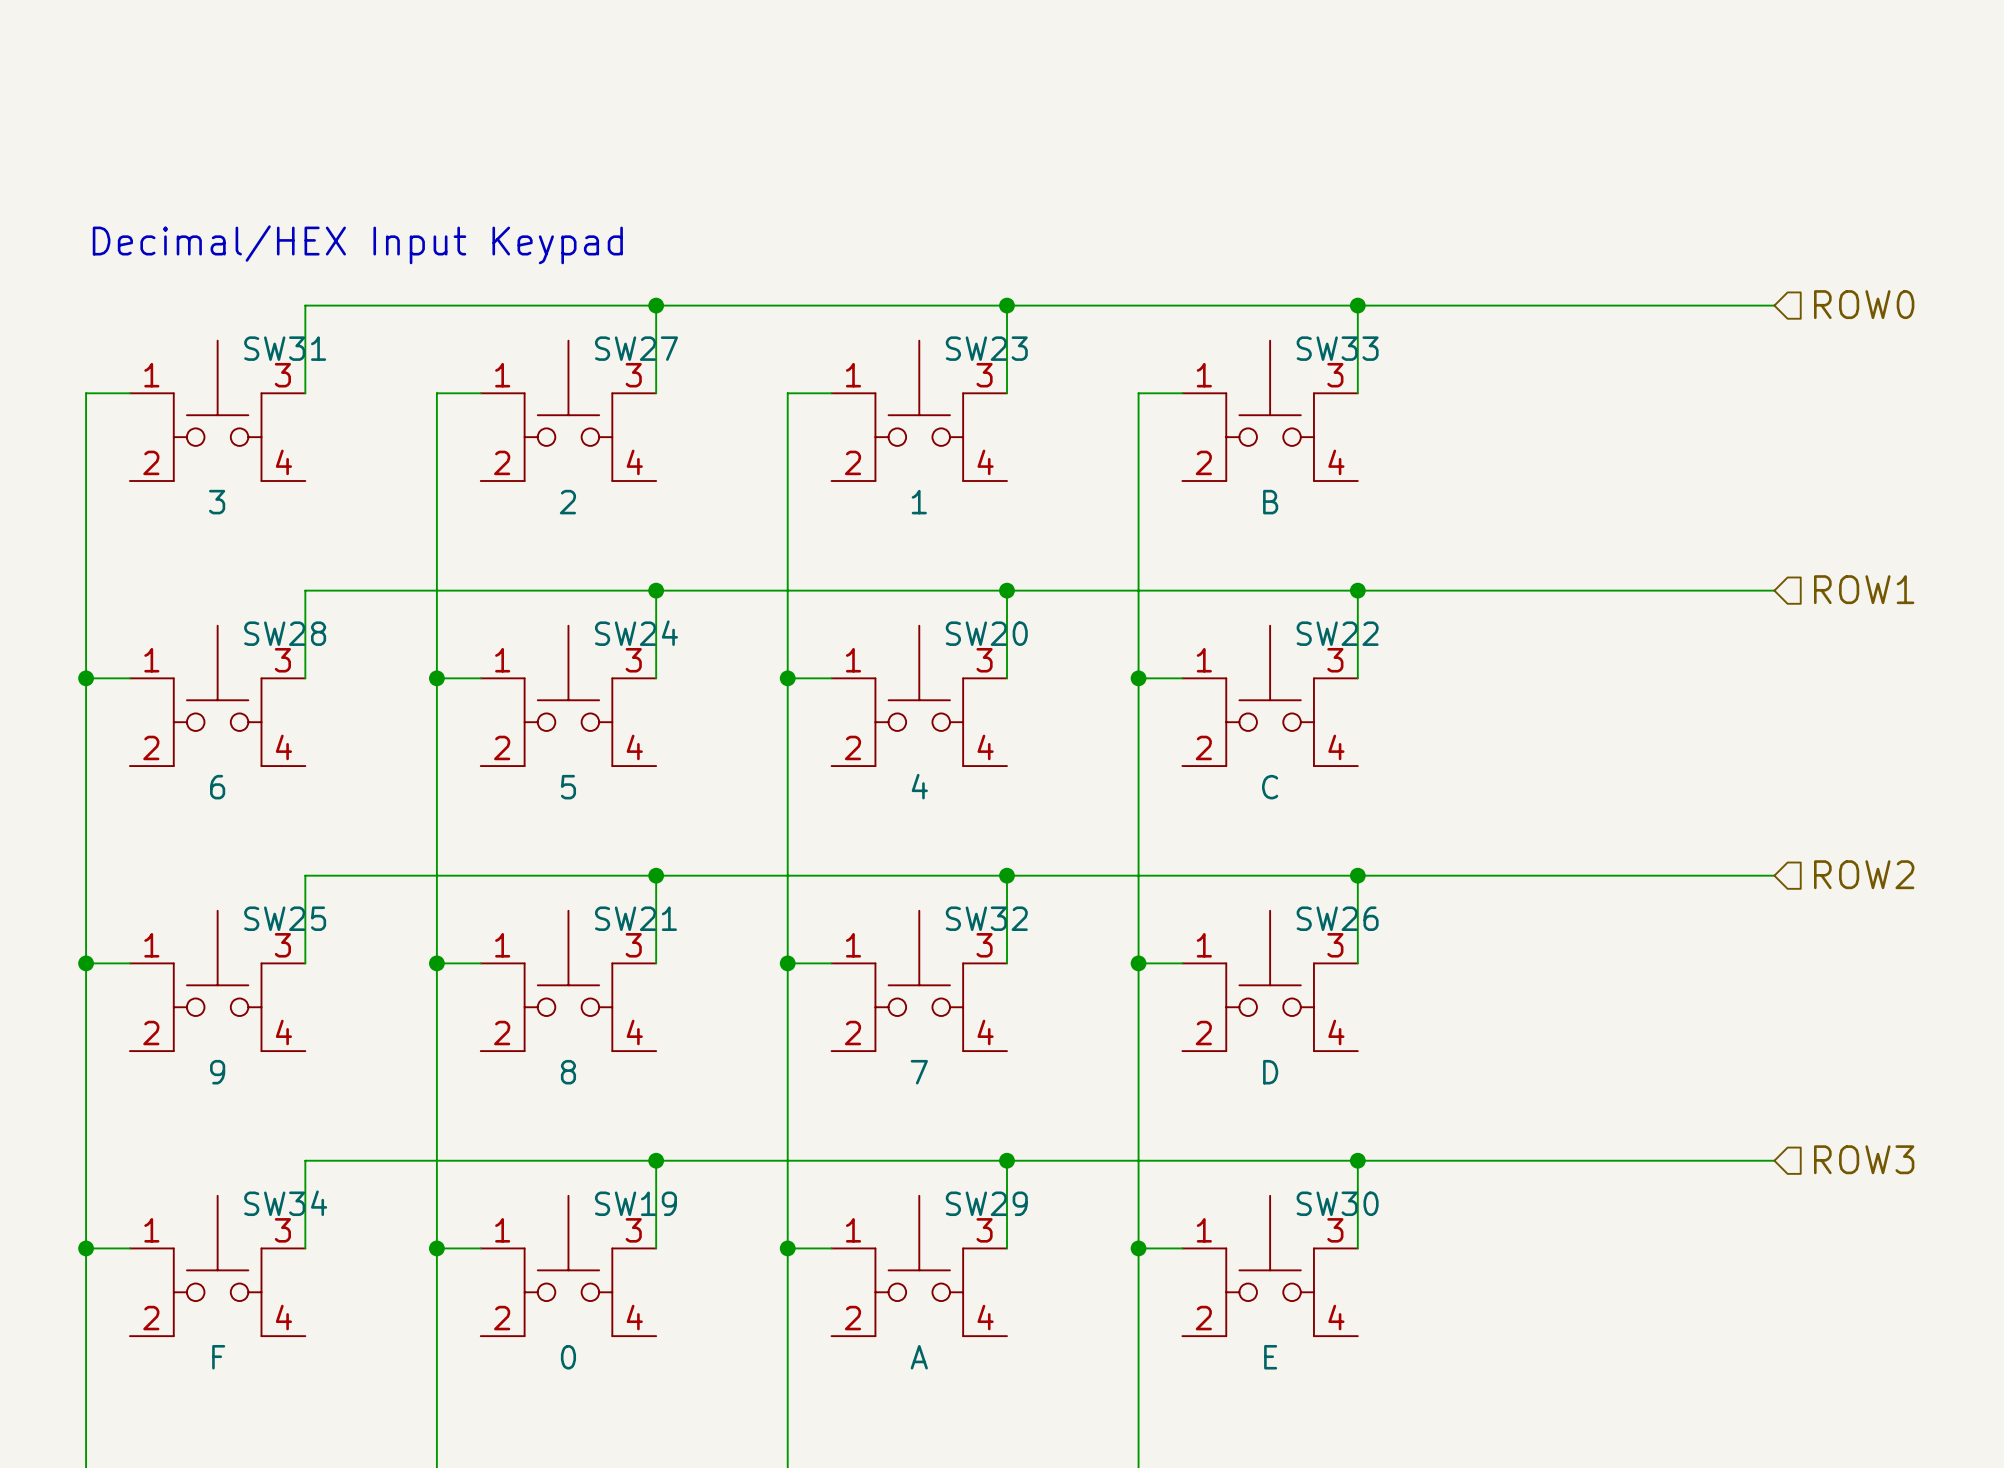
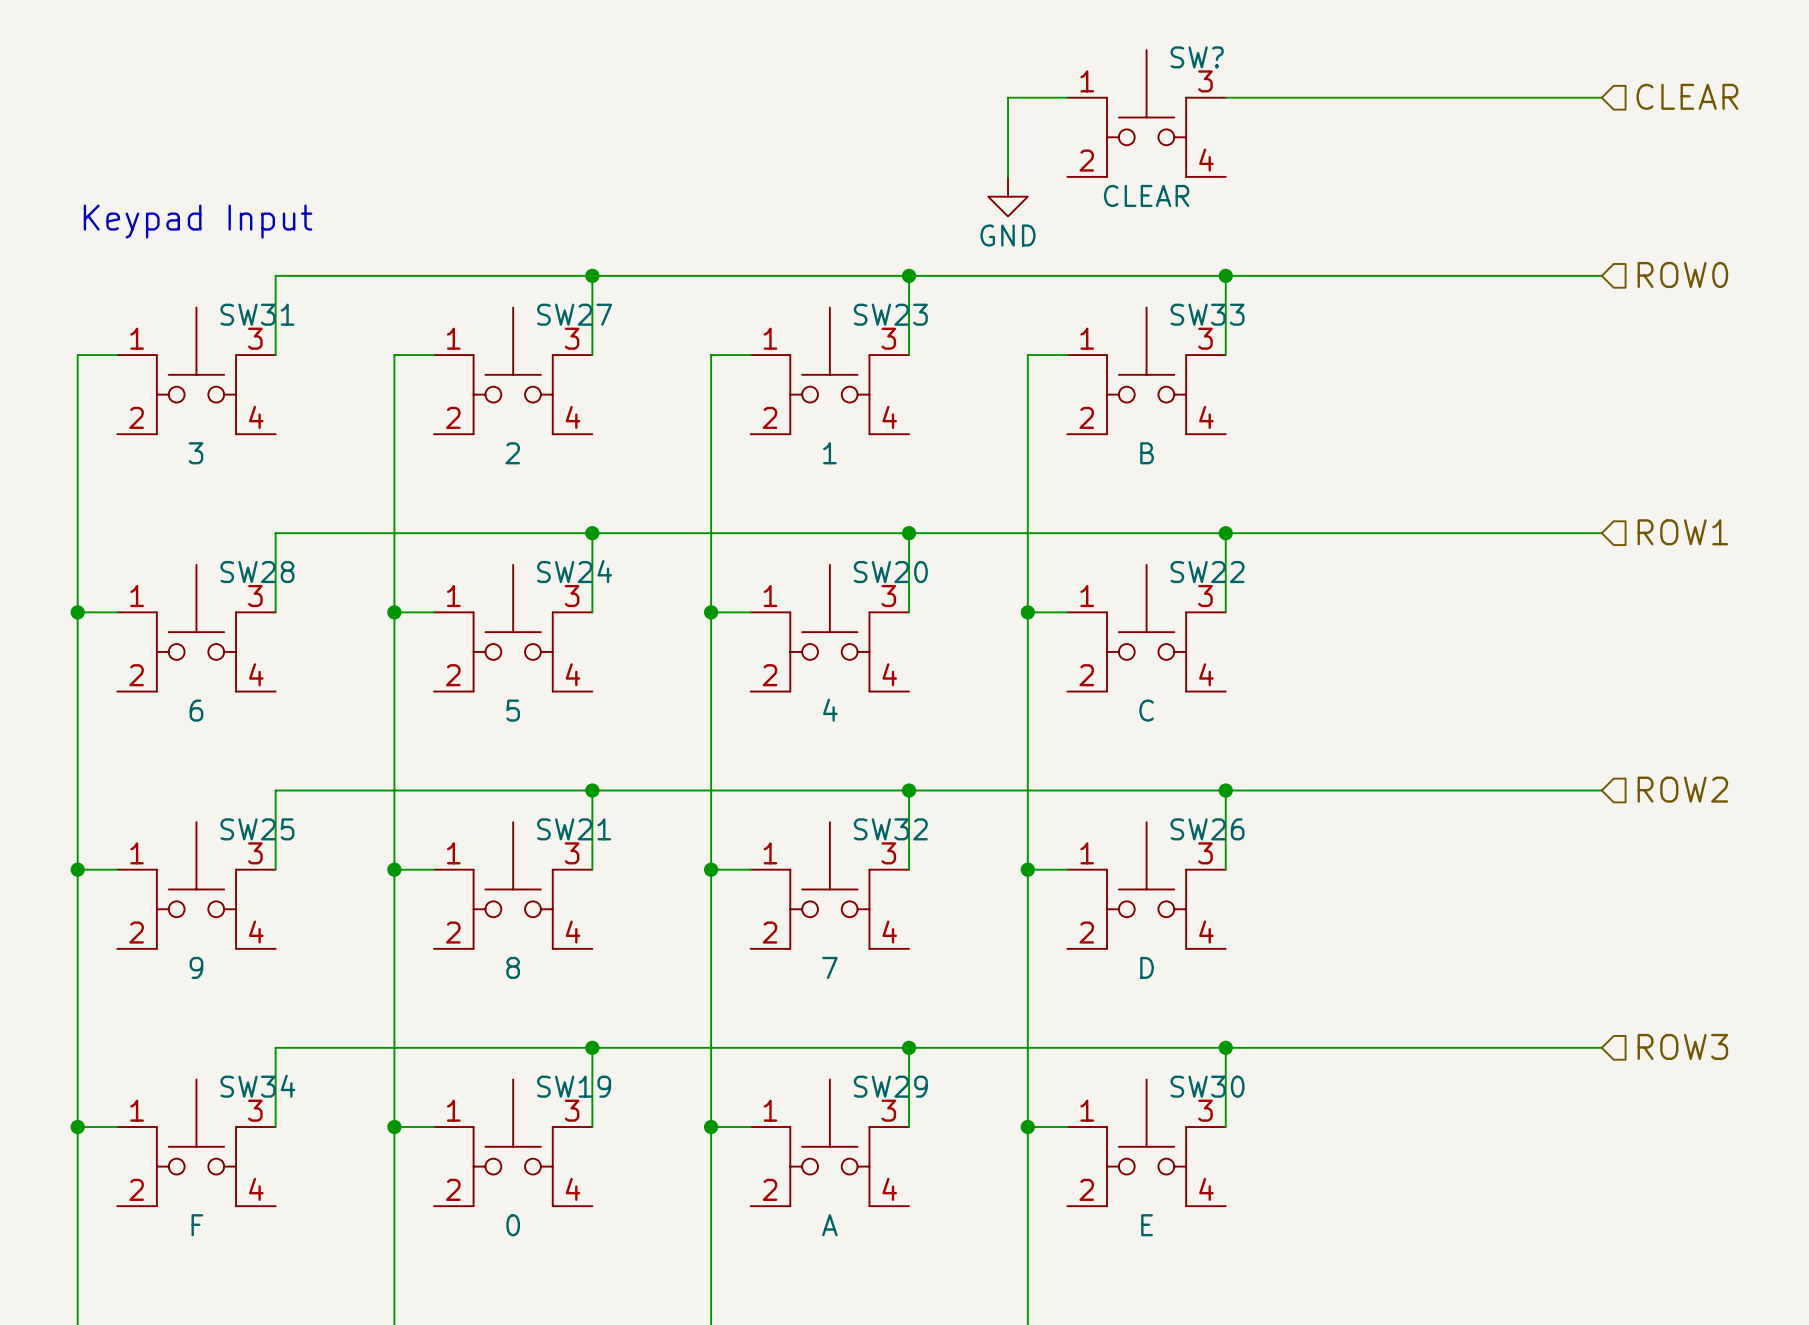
hierarchical label: none -> CLEAR (1687, 96)
wire: none -> (1067, 97) (1008, 97) (1008, 176)
wire: none -> (1225, 97) (1601, 97)
SW?: none -> CLEAR (1146, 113)
power symbol: none -> GND (1008, 196)
text: Decimal/HEX Input Keypad (357, 244) -> Keypad Input (198, 221)

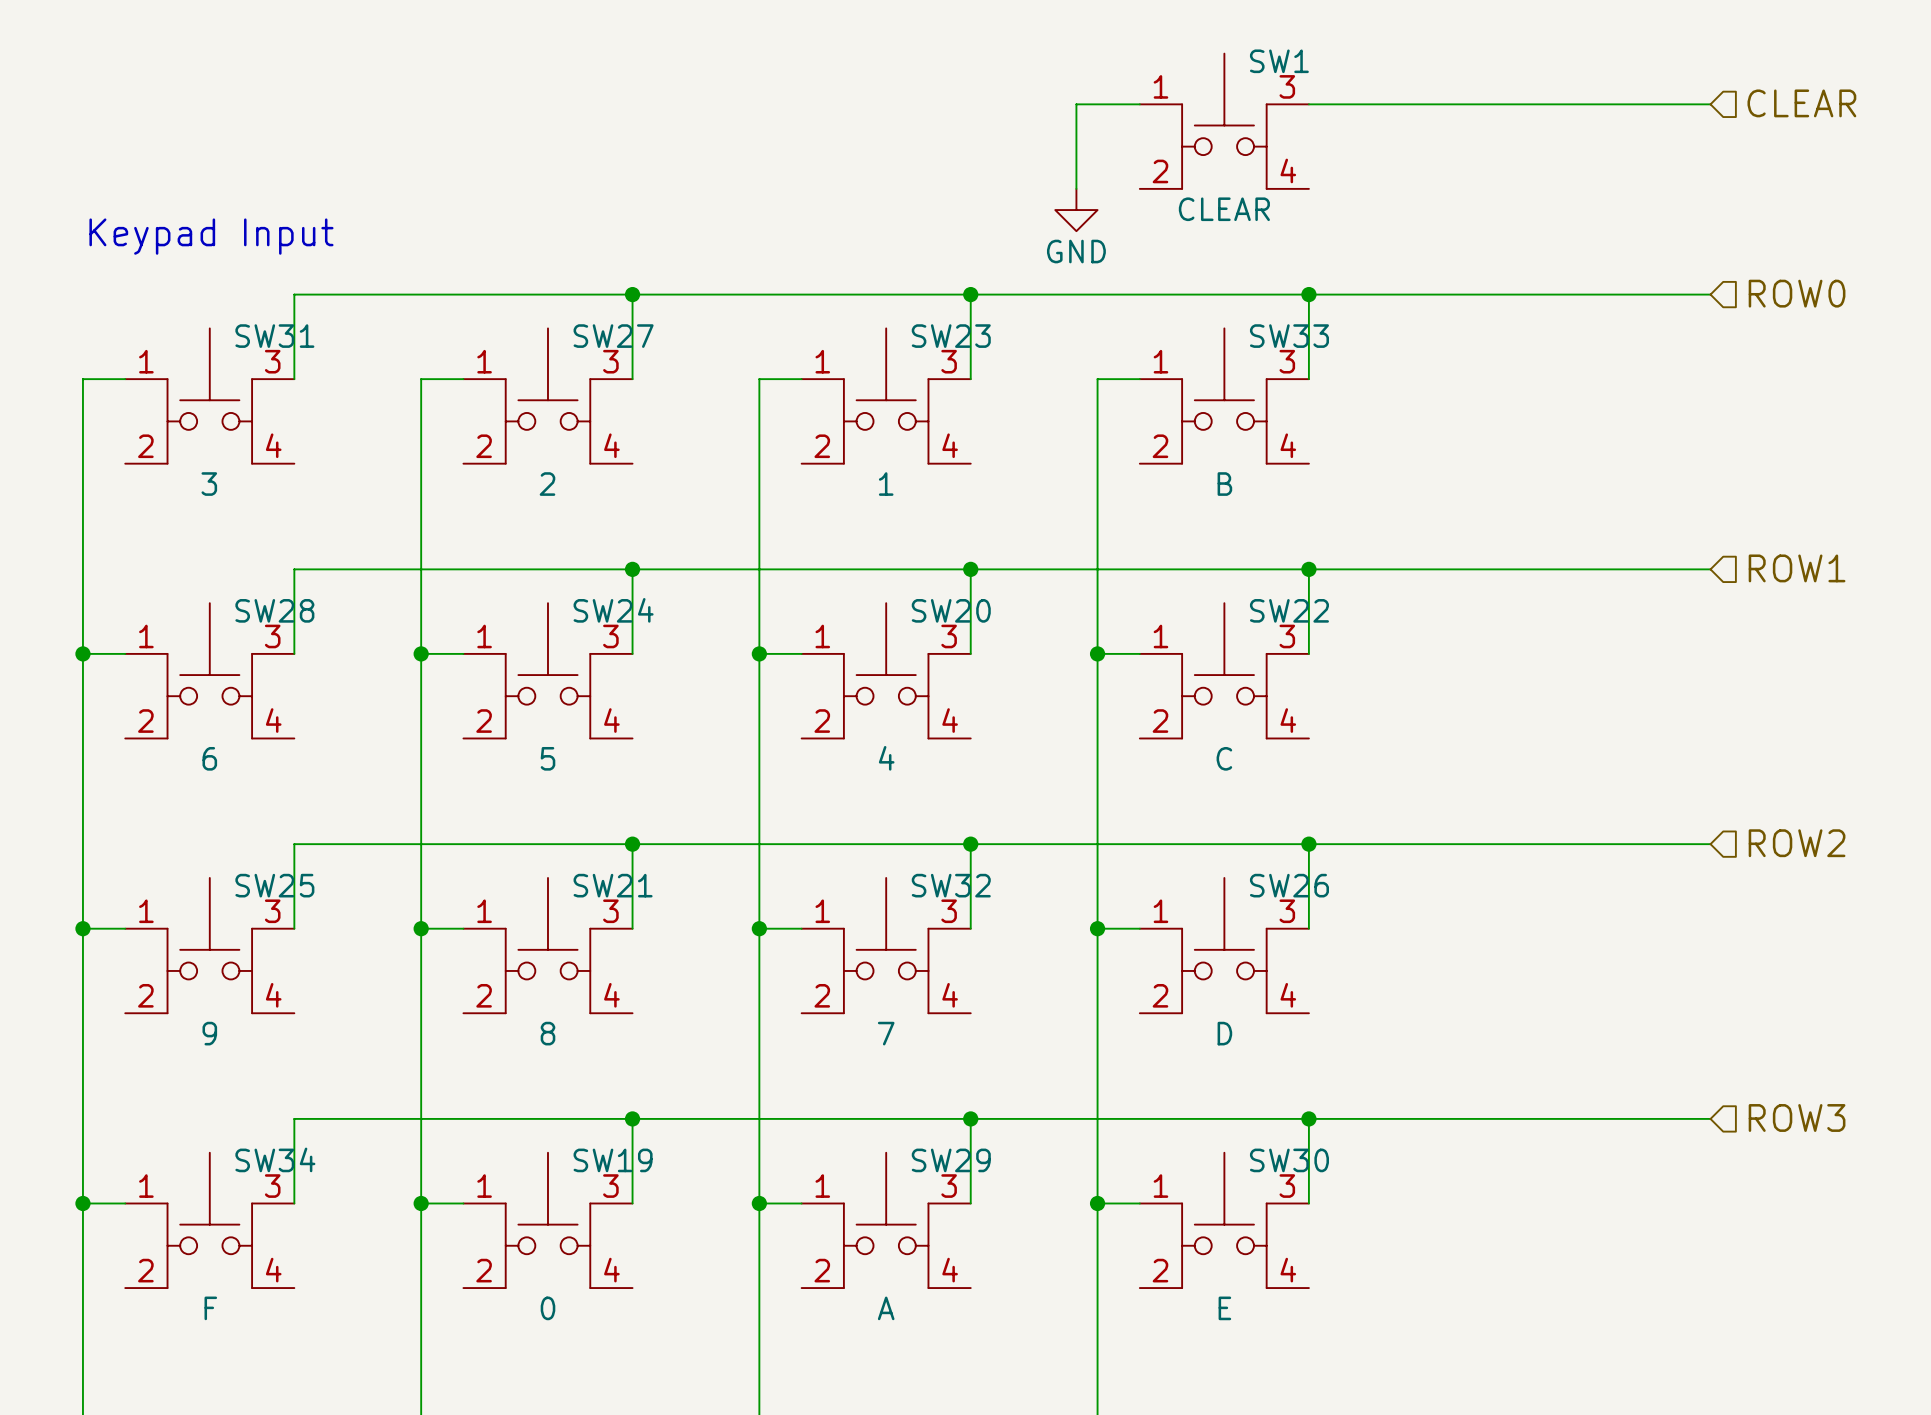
SW? name: SW? (1197, 57) -> SW1 (1279, 61)

